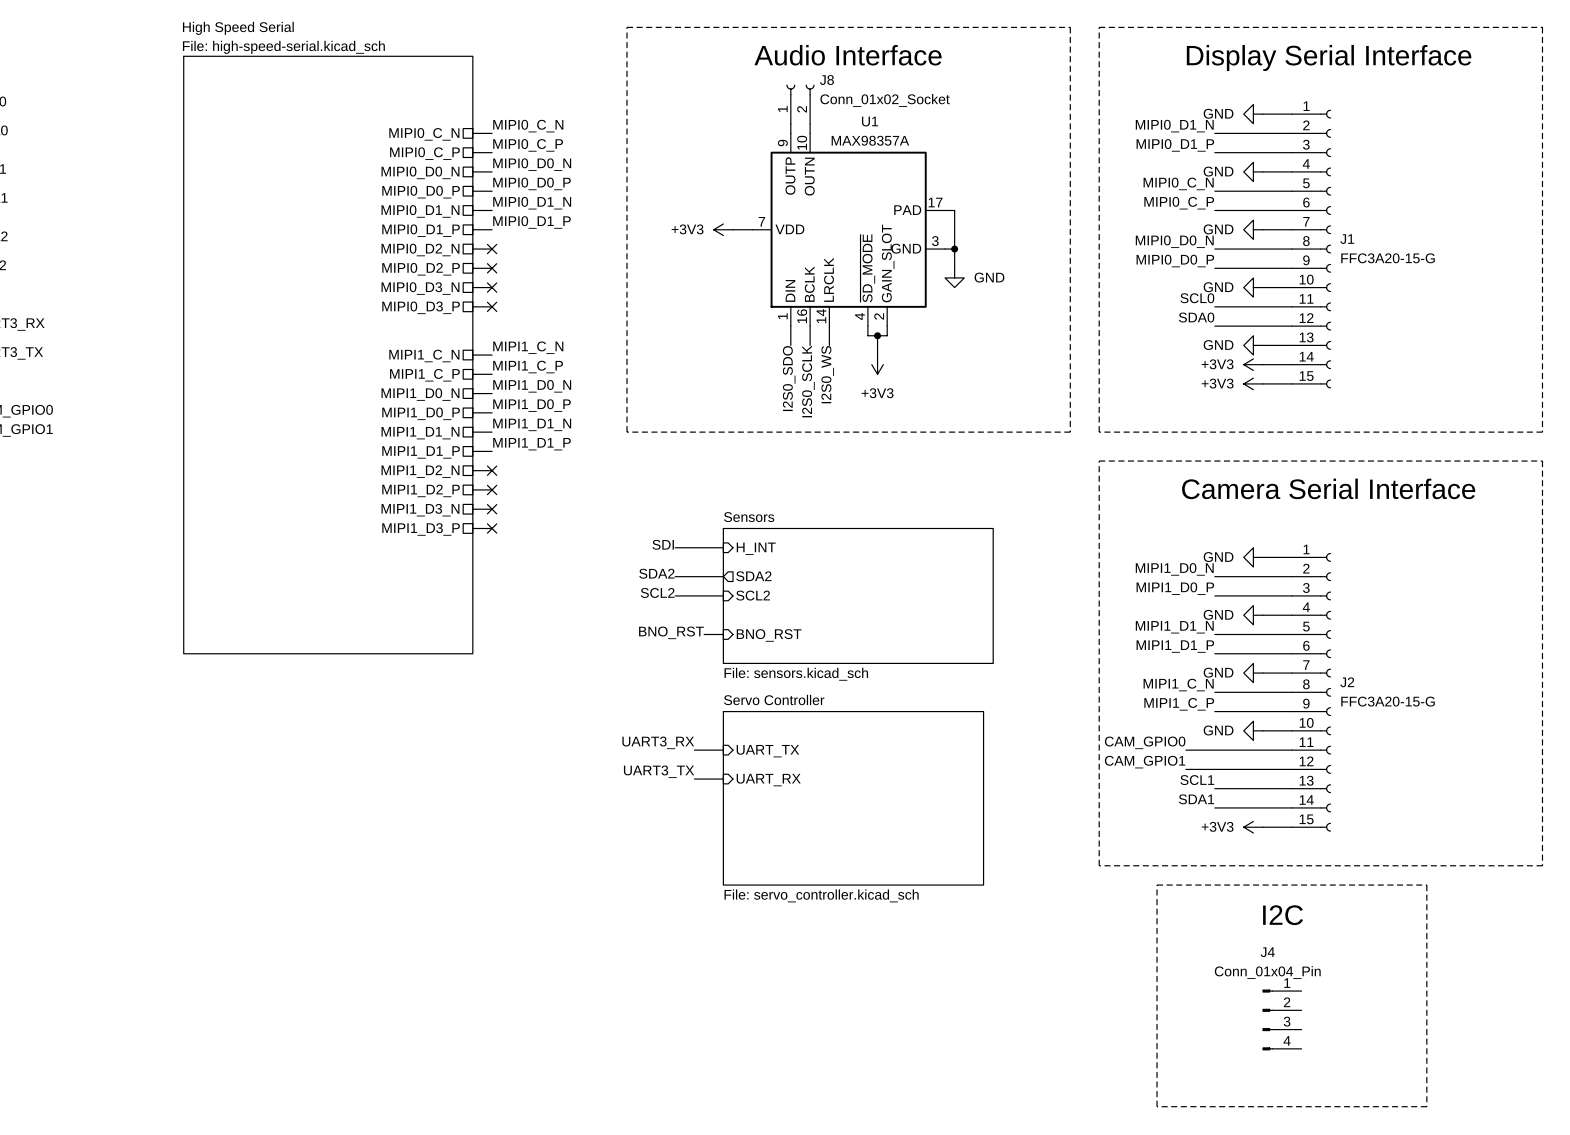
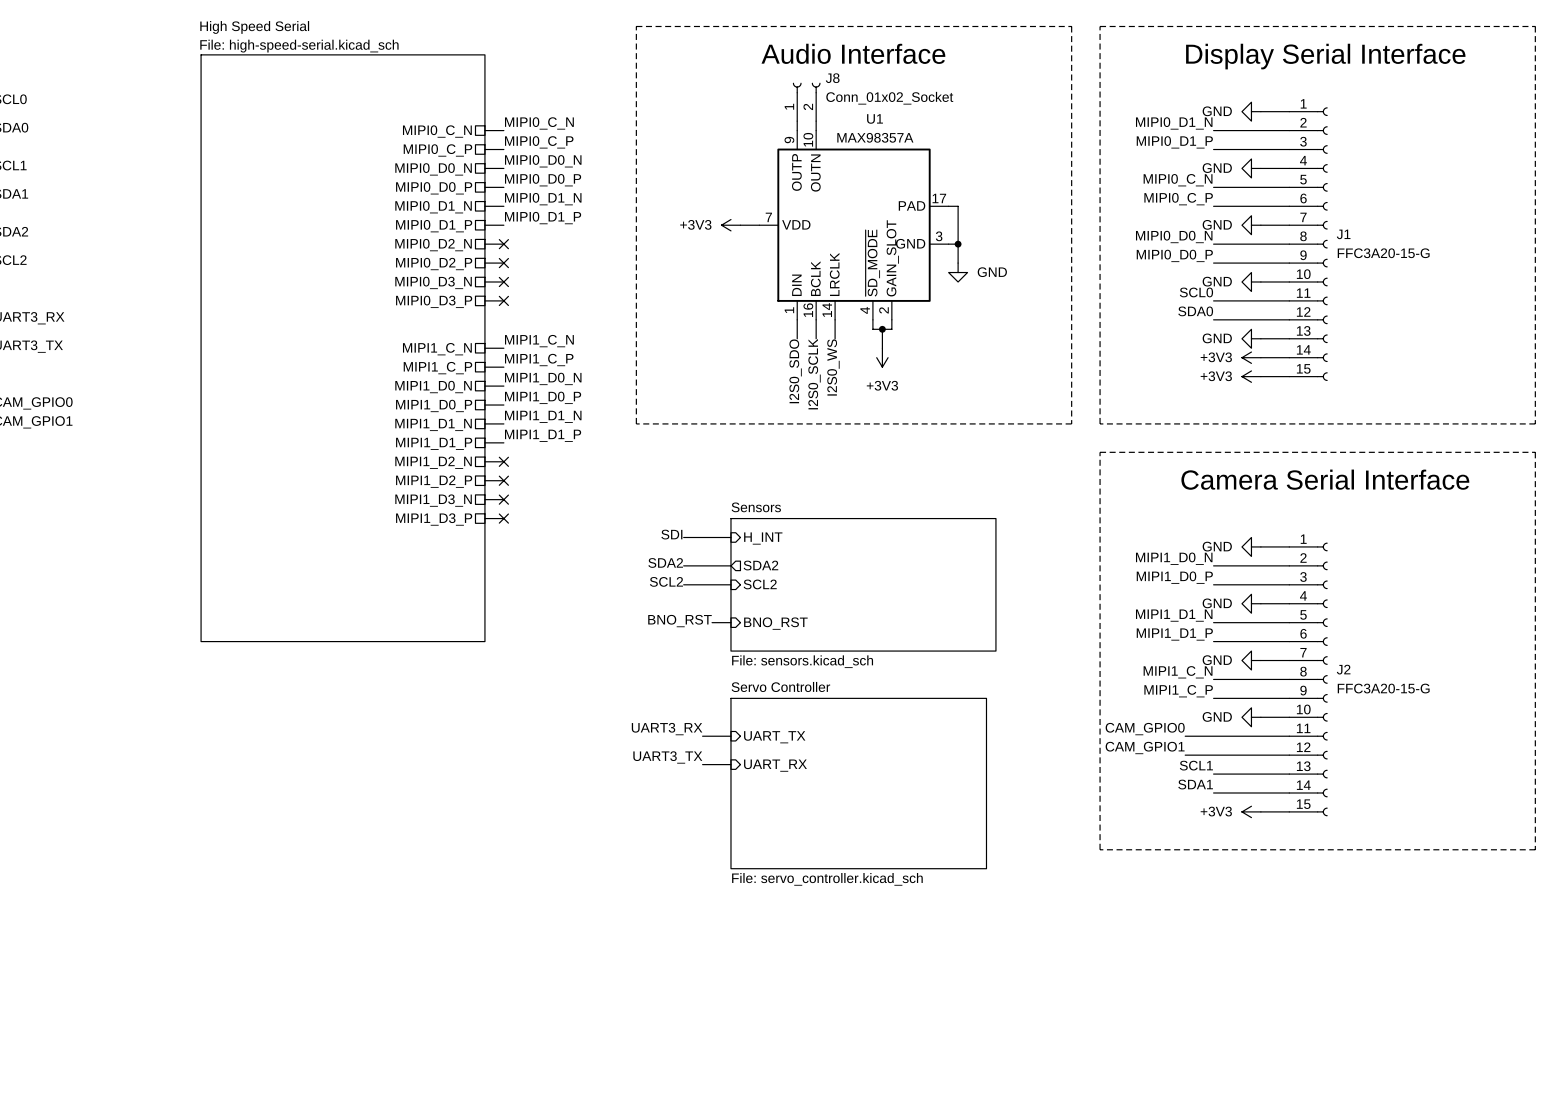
line: (1157, 885) (1426, 885) (1426, 1106) (1157, 1106) (1157, 885) -> none
text: I2C (1283, 915) -> none
J4: Conn_01x04_Pin (1282, 1019) -> none

